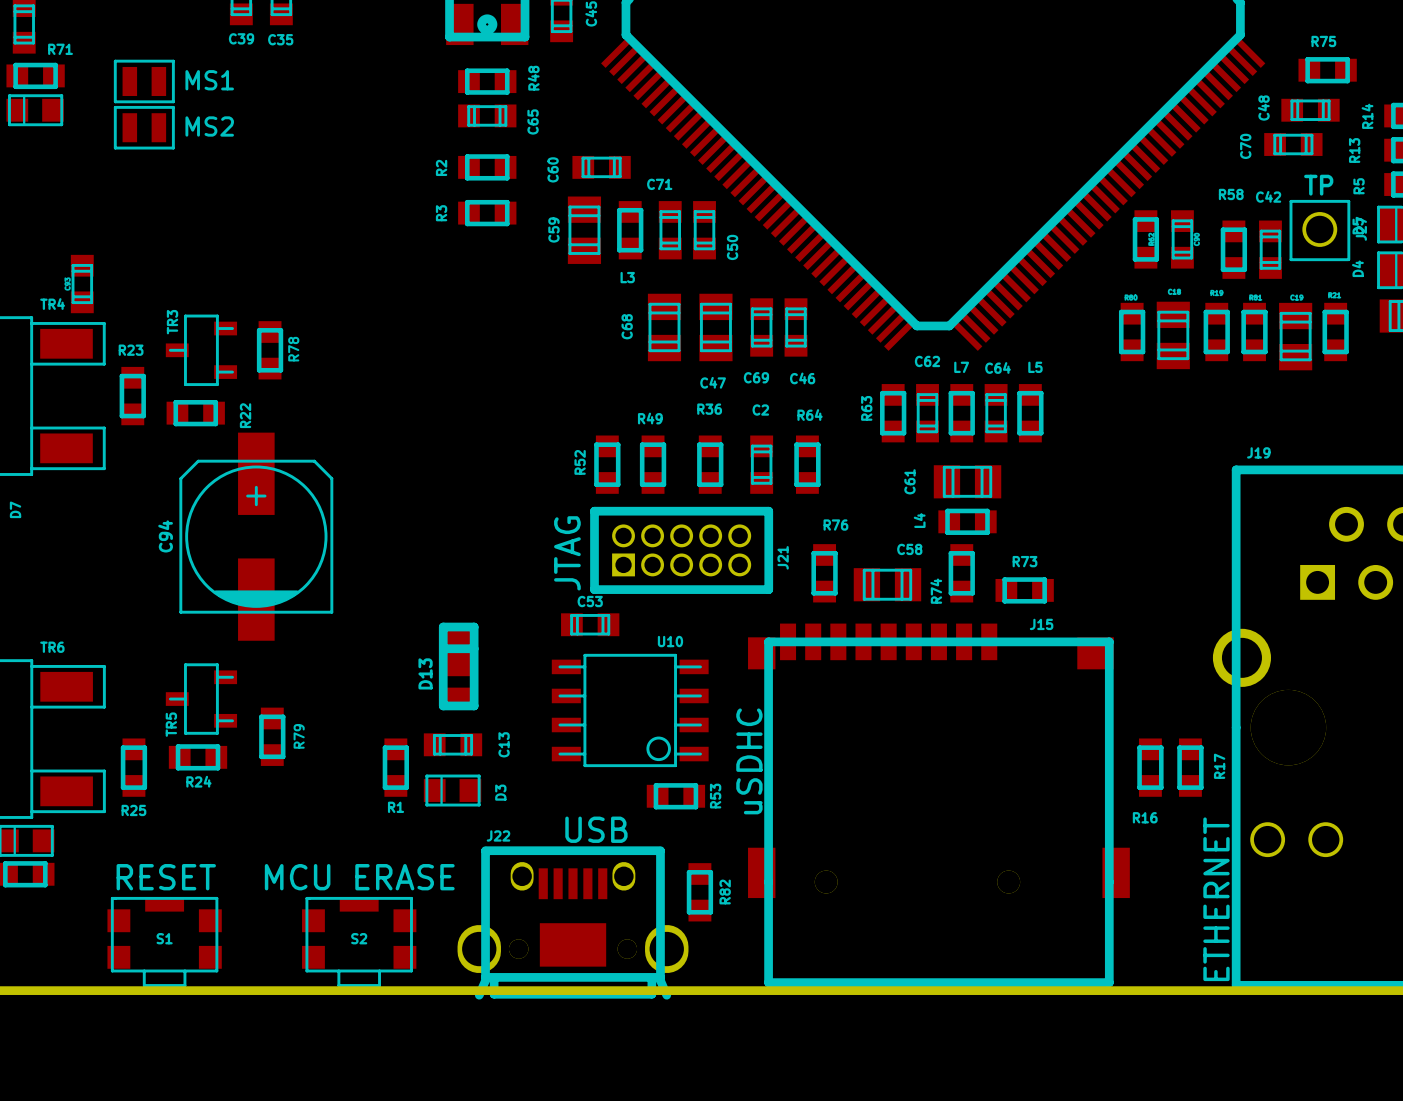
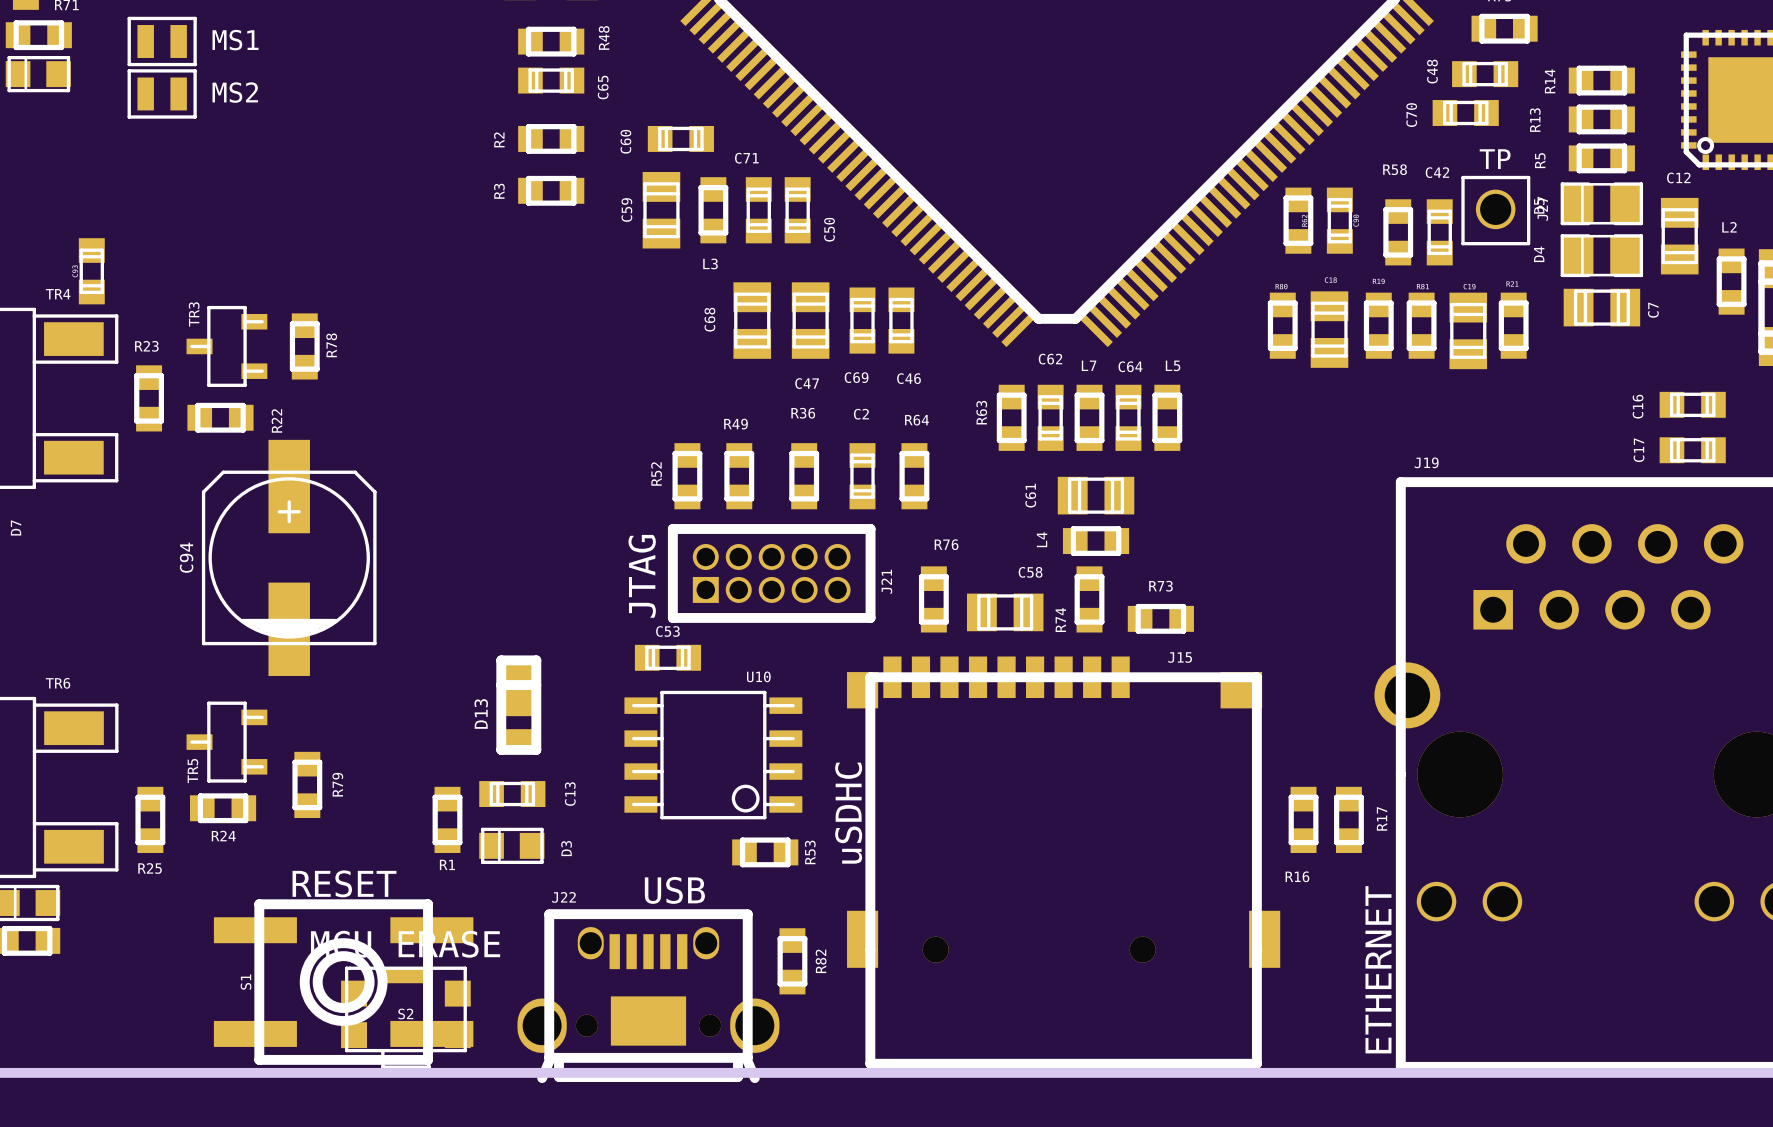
S1 footprint: [107, 896, 222, 987] -> [213, 899, 474, 1065]
S1 name position: S1 (164, 938) -> S1 (246, 982)

